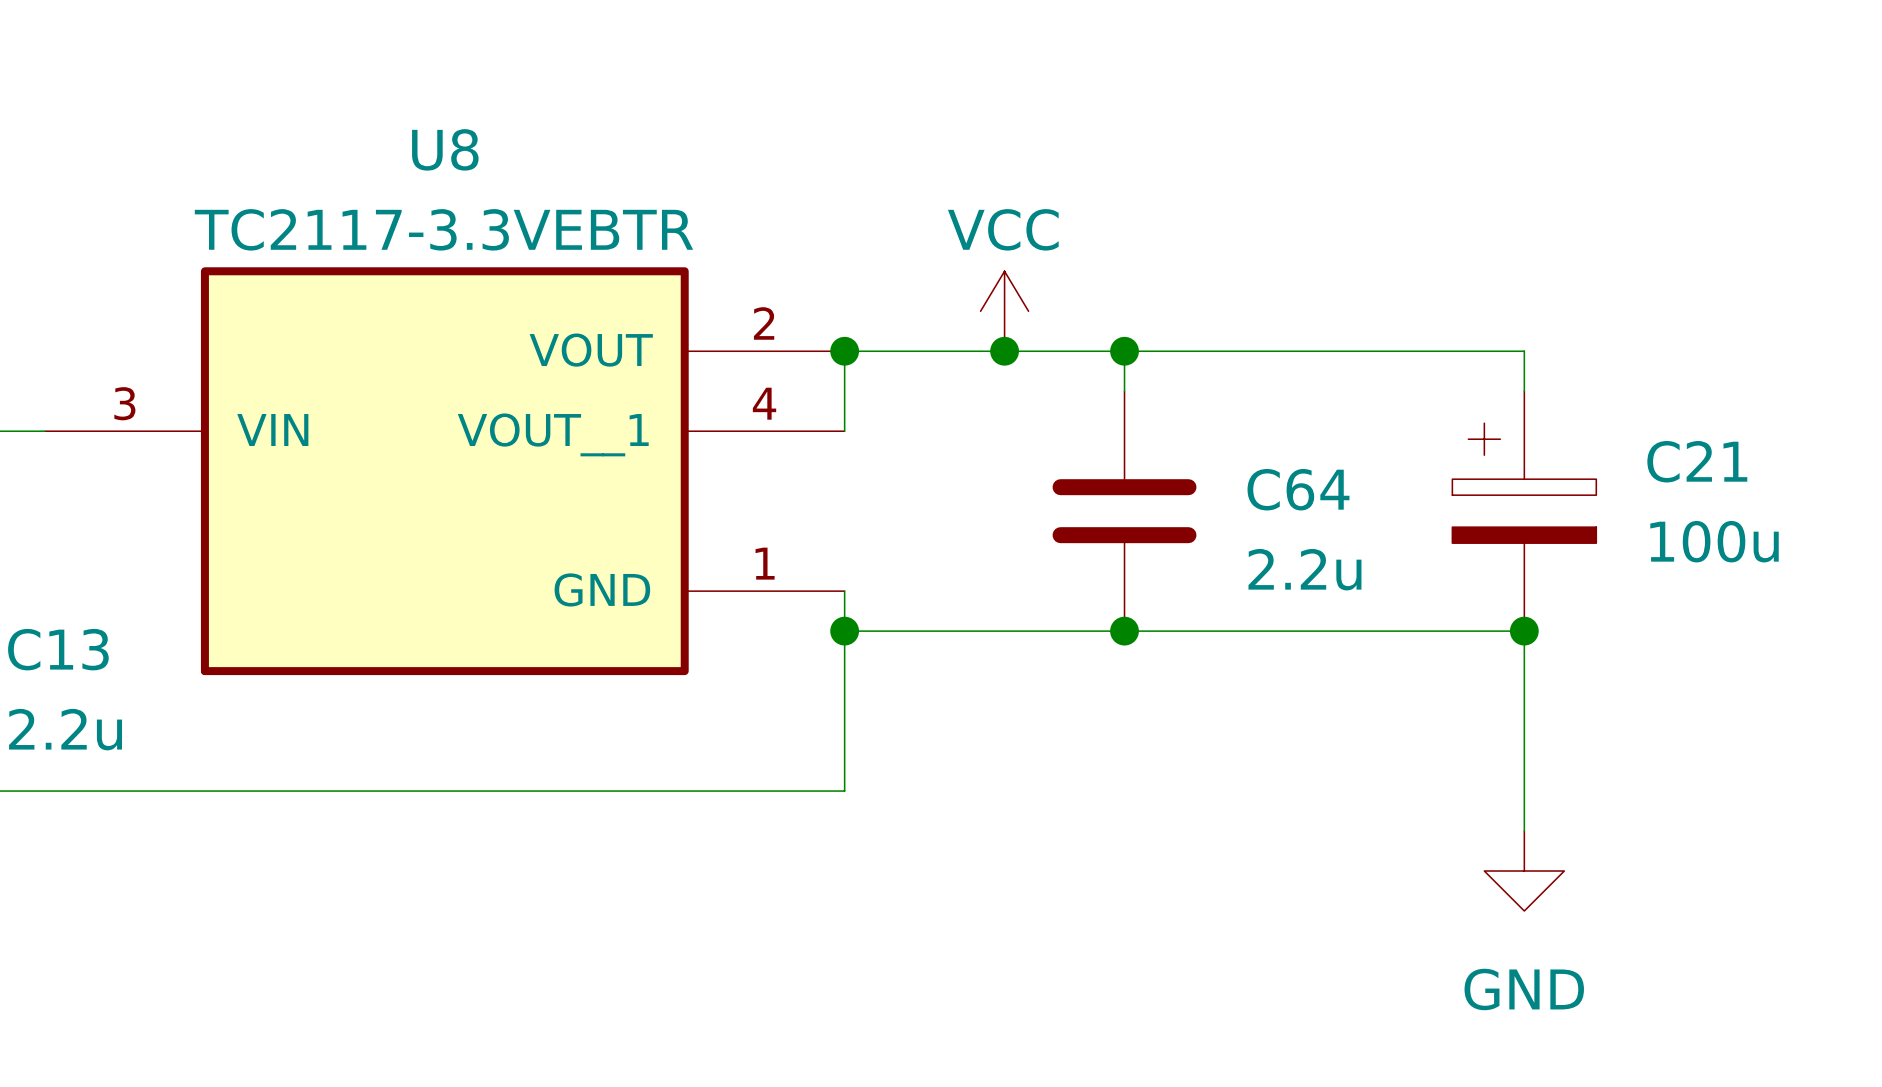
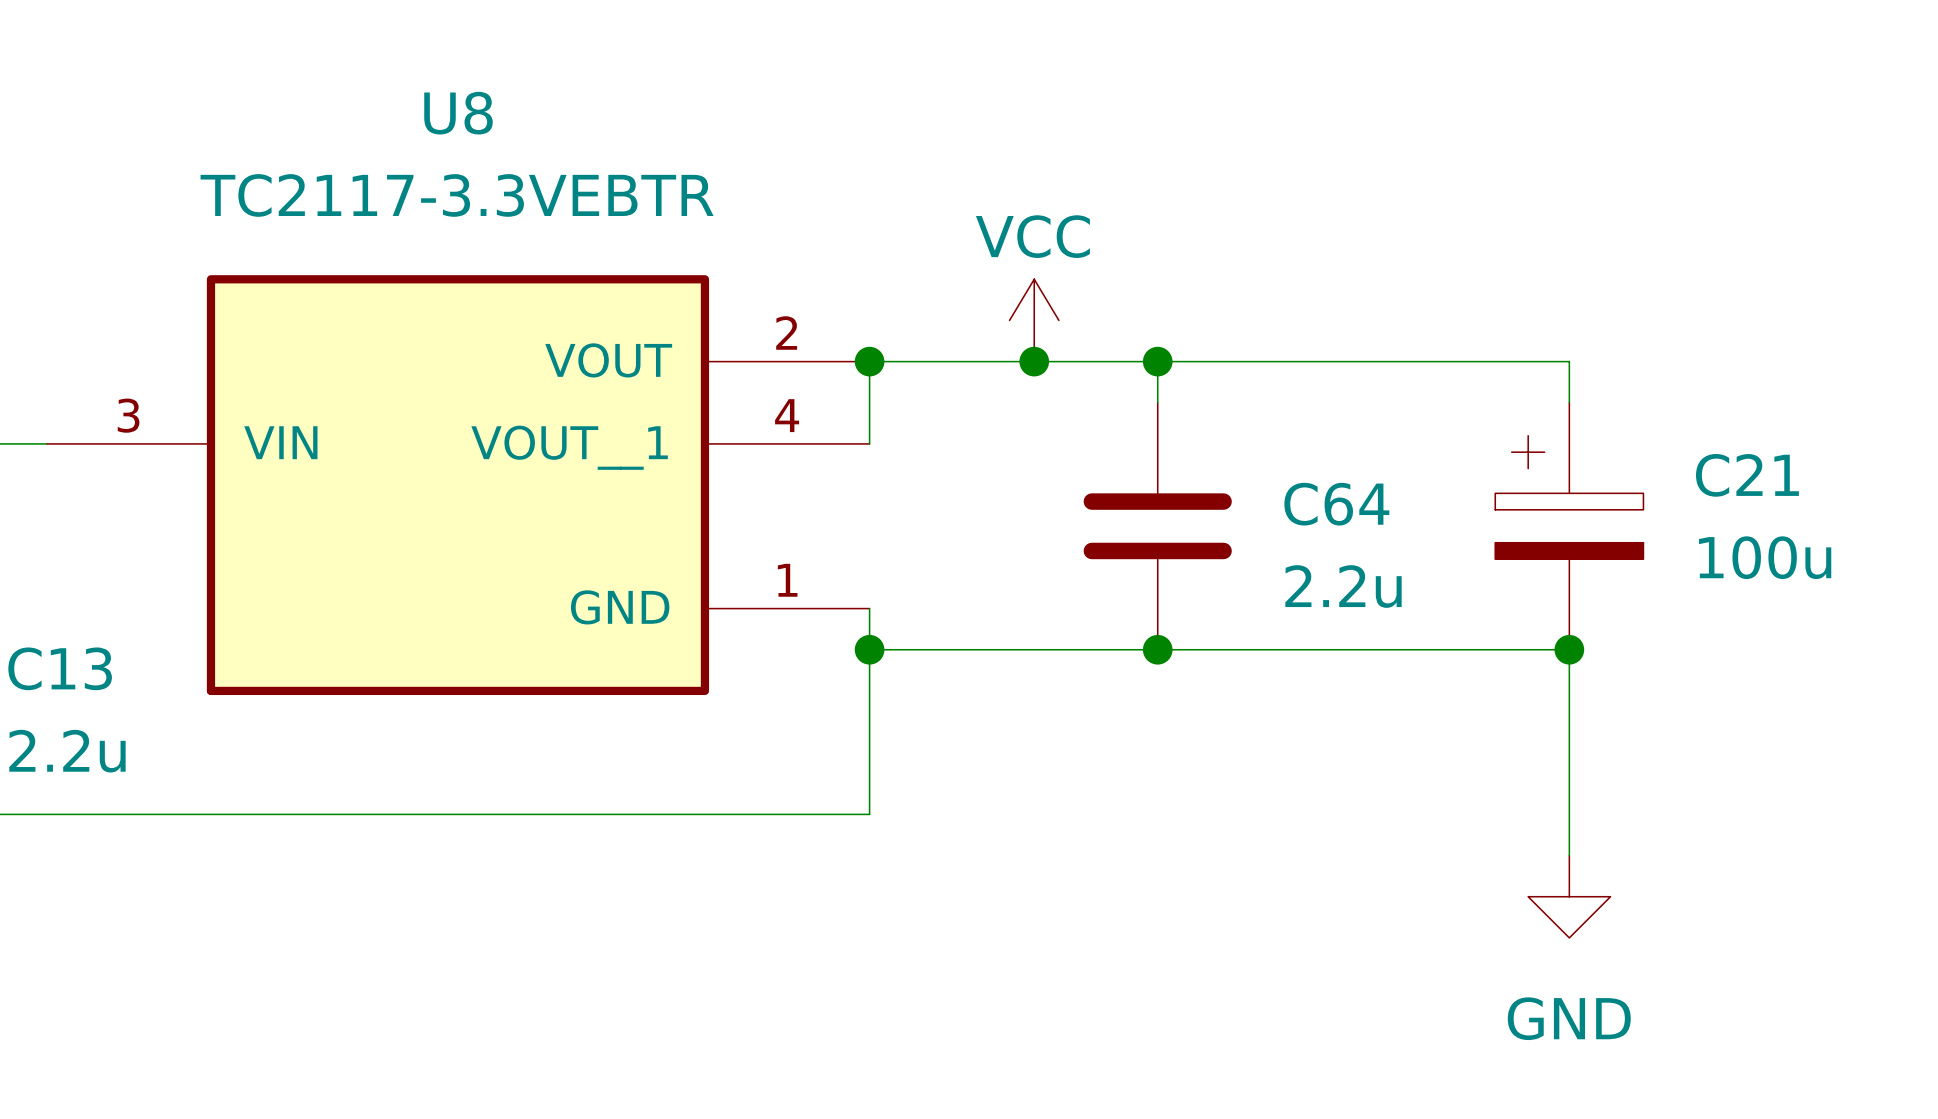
U8 name position: U8 (445, 149) -> U8 (458, 113)
U8 value position: TC2117-3.3VEBTR (443, 229) -> TC2117-3.3VEBTR (457, 195)

